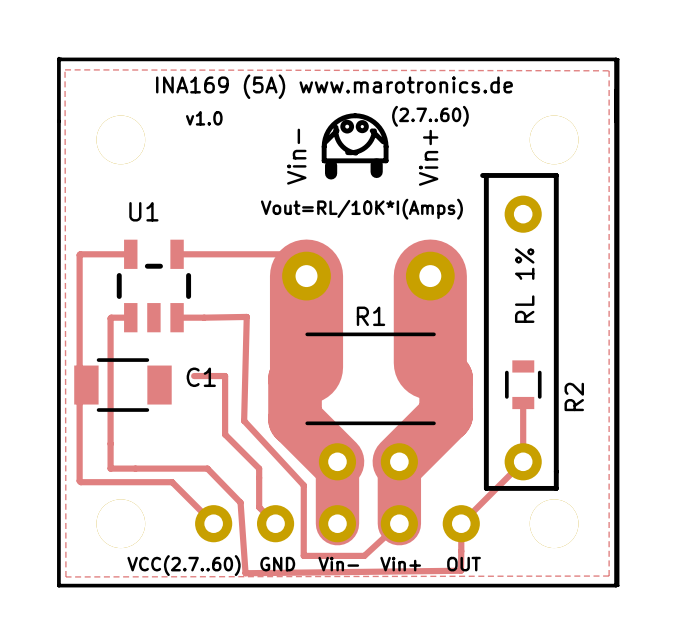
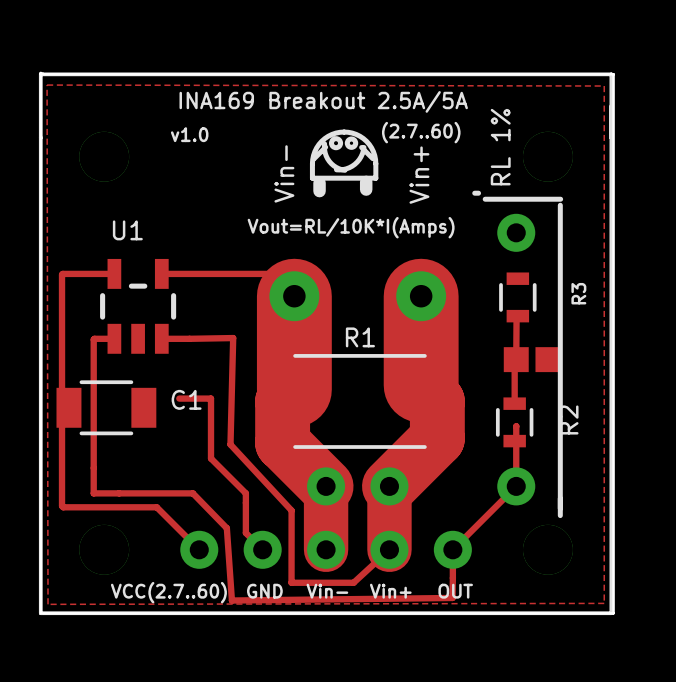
part footprint: [57, 57, 618, 588] -> [38, 72, 614, 616]
part value: INA169 (5A) www.marotronics.de (334, 86) -> INA169 Breakout 2.5A/5A (323, 101)
line: (486, 175) (556, 175) (556, 488) (486, 488) (486, 175) -> none
line: none -> (485, 199) (560, 199)
line: none -> (560, 205) (560, 515)
R3: none -> (517, 297)
text position: RL 1% (524, 285) -> RL 1% (500, 147)
track: none -> (517, 316) (514, 361) (514, 403)
R2 position: (523, 384) -> (514, 422)

